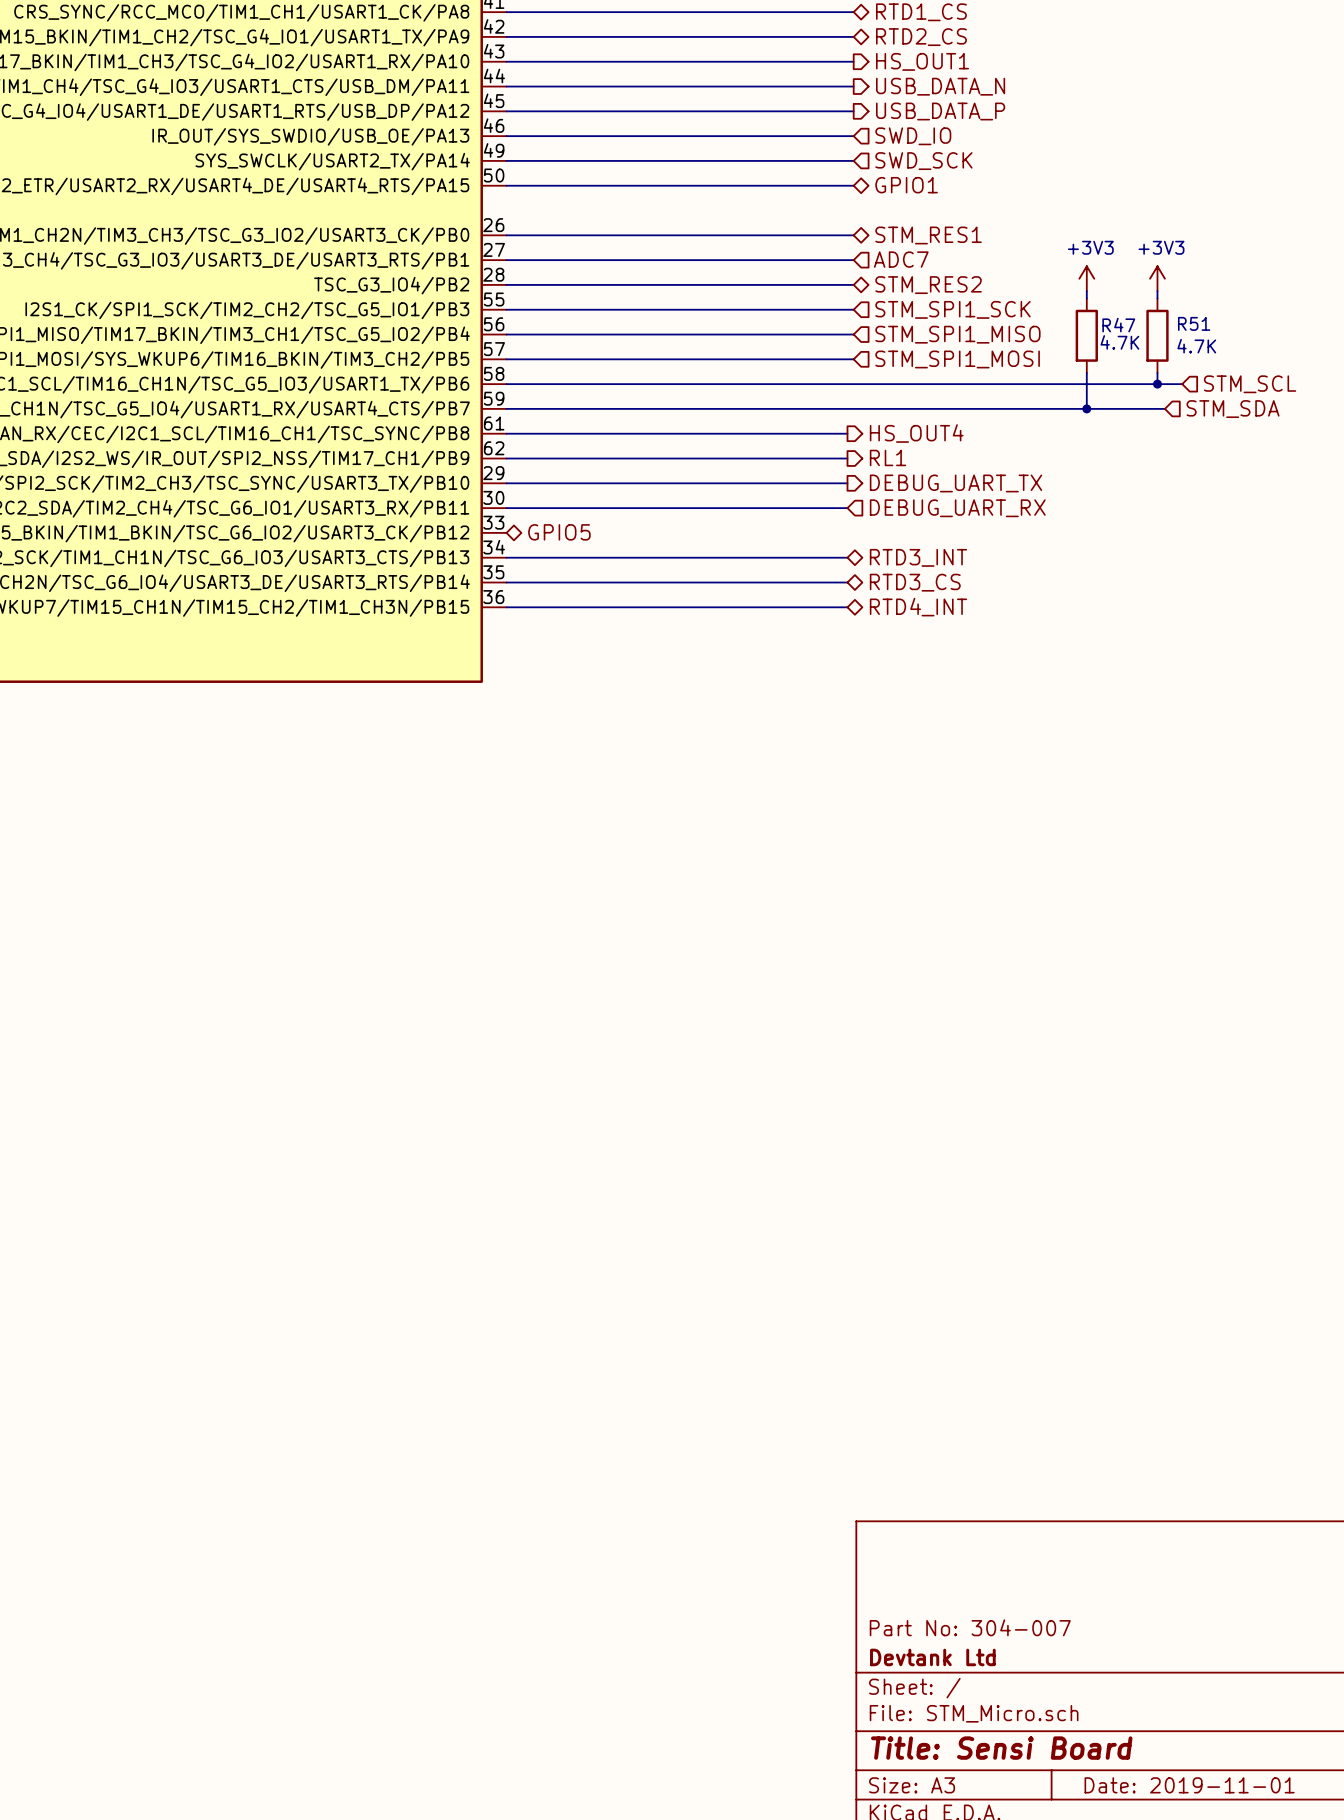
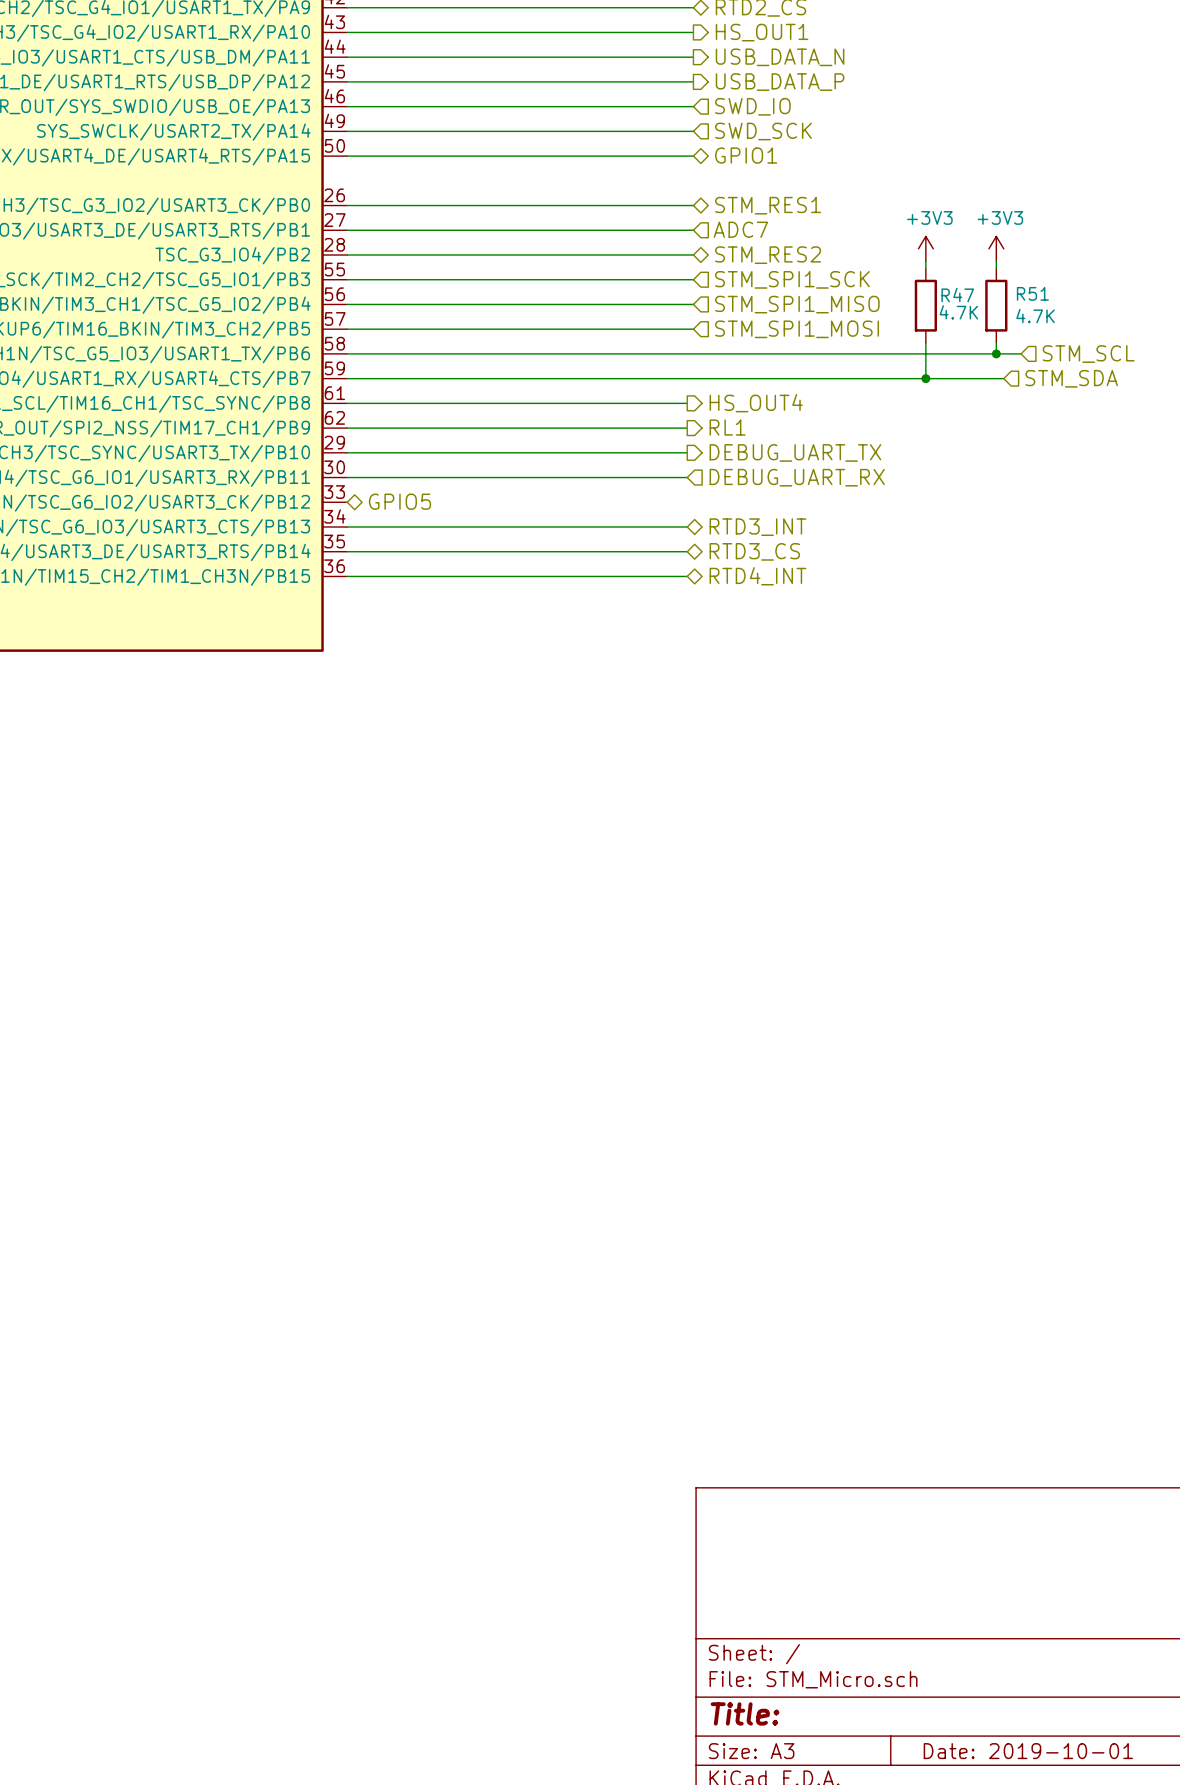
title block: Part No: 304-007 (970, 1627) -> none
title block: Devtank Ltd (932, 1657) -> none
title block: Title: Sensi Board (1001, 1748) -> Title: (745, 1713)
title block: Date: 2019-11-01 (1189, 1785) -> Date: 2019-10-01 (1028, 1751)

